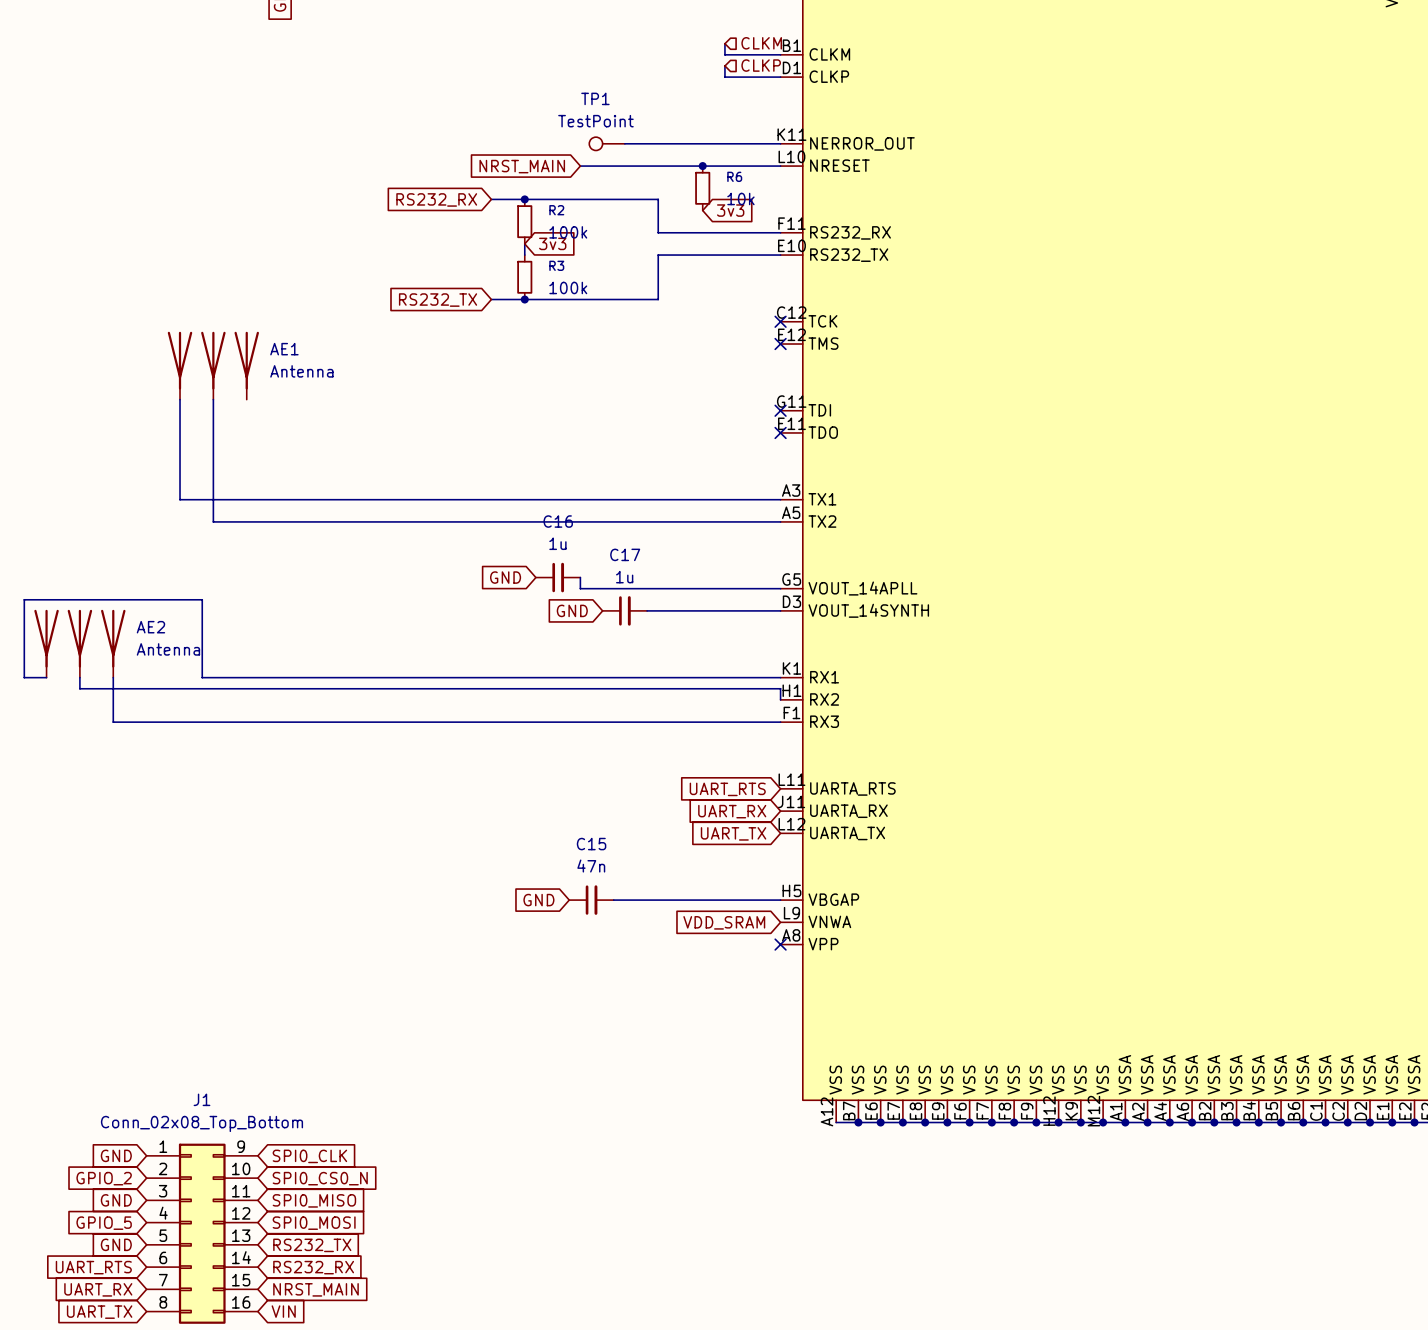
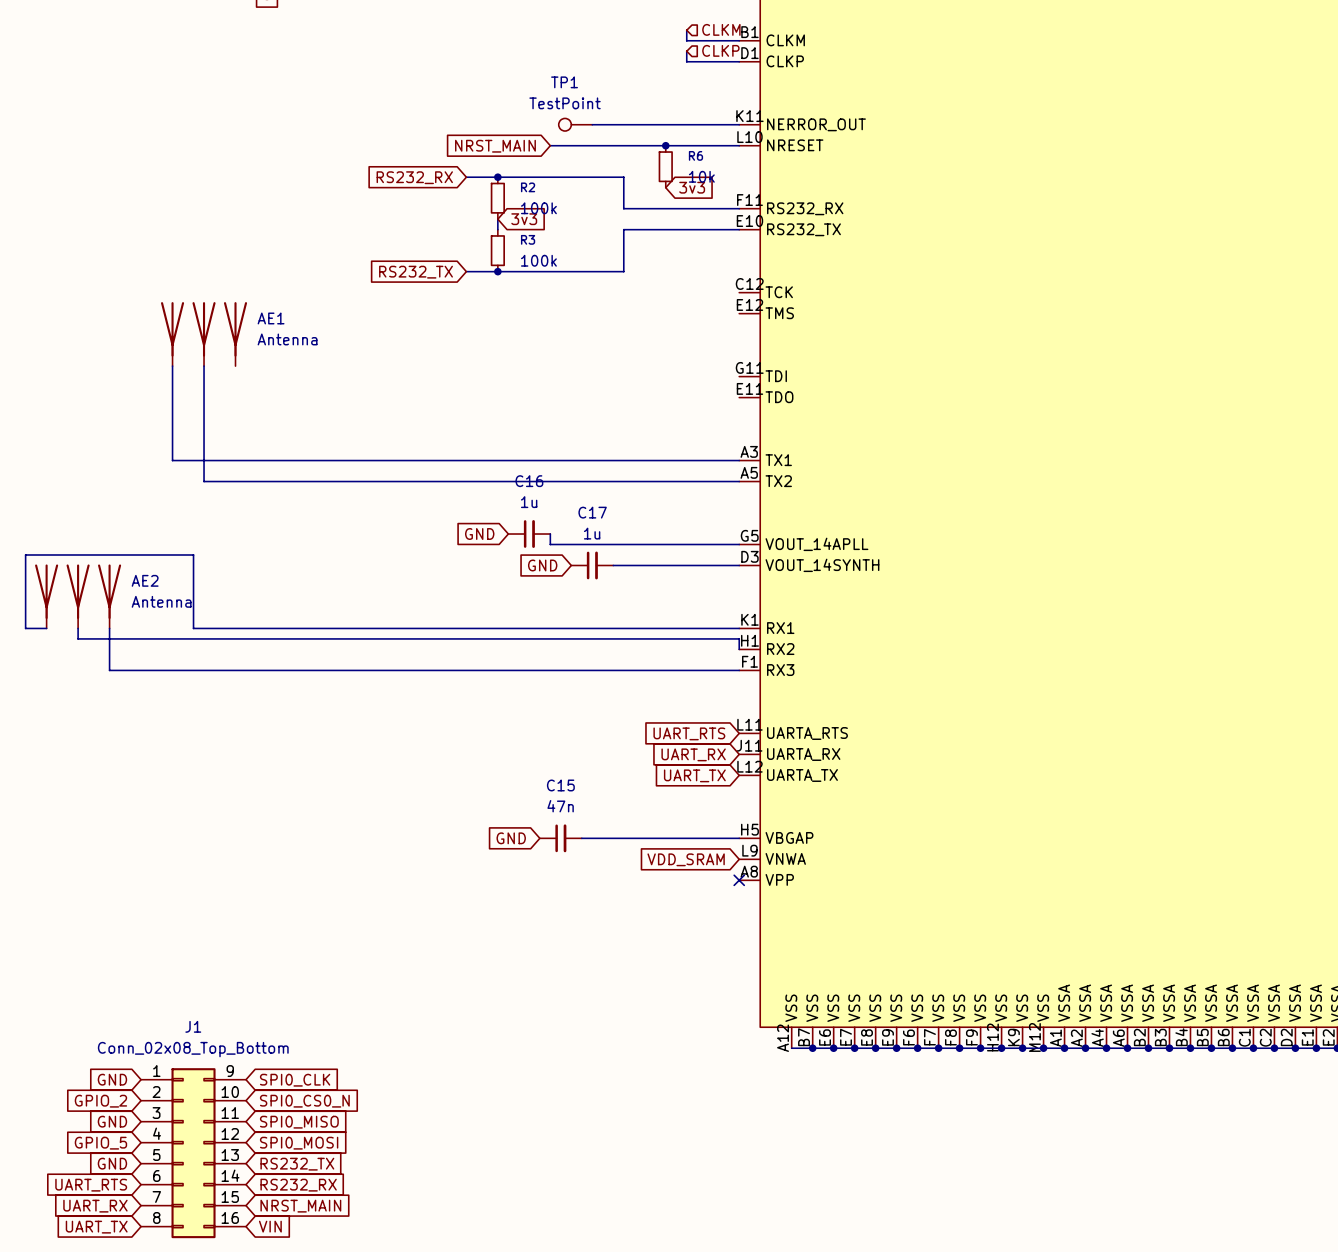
no-connect mark: (780, 321) -> none
no-connect mark: (780, 344) -> none
no-connect mark: (780, 410) -> none
no-connect mark: (780, 432) -> none

